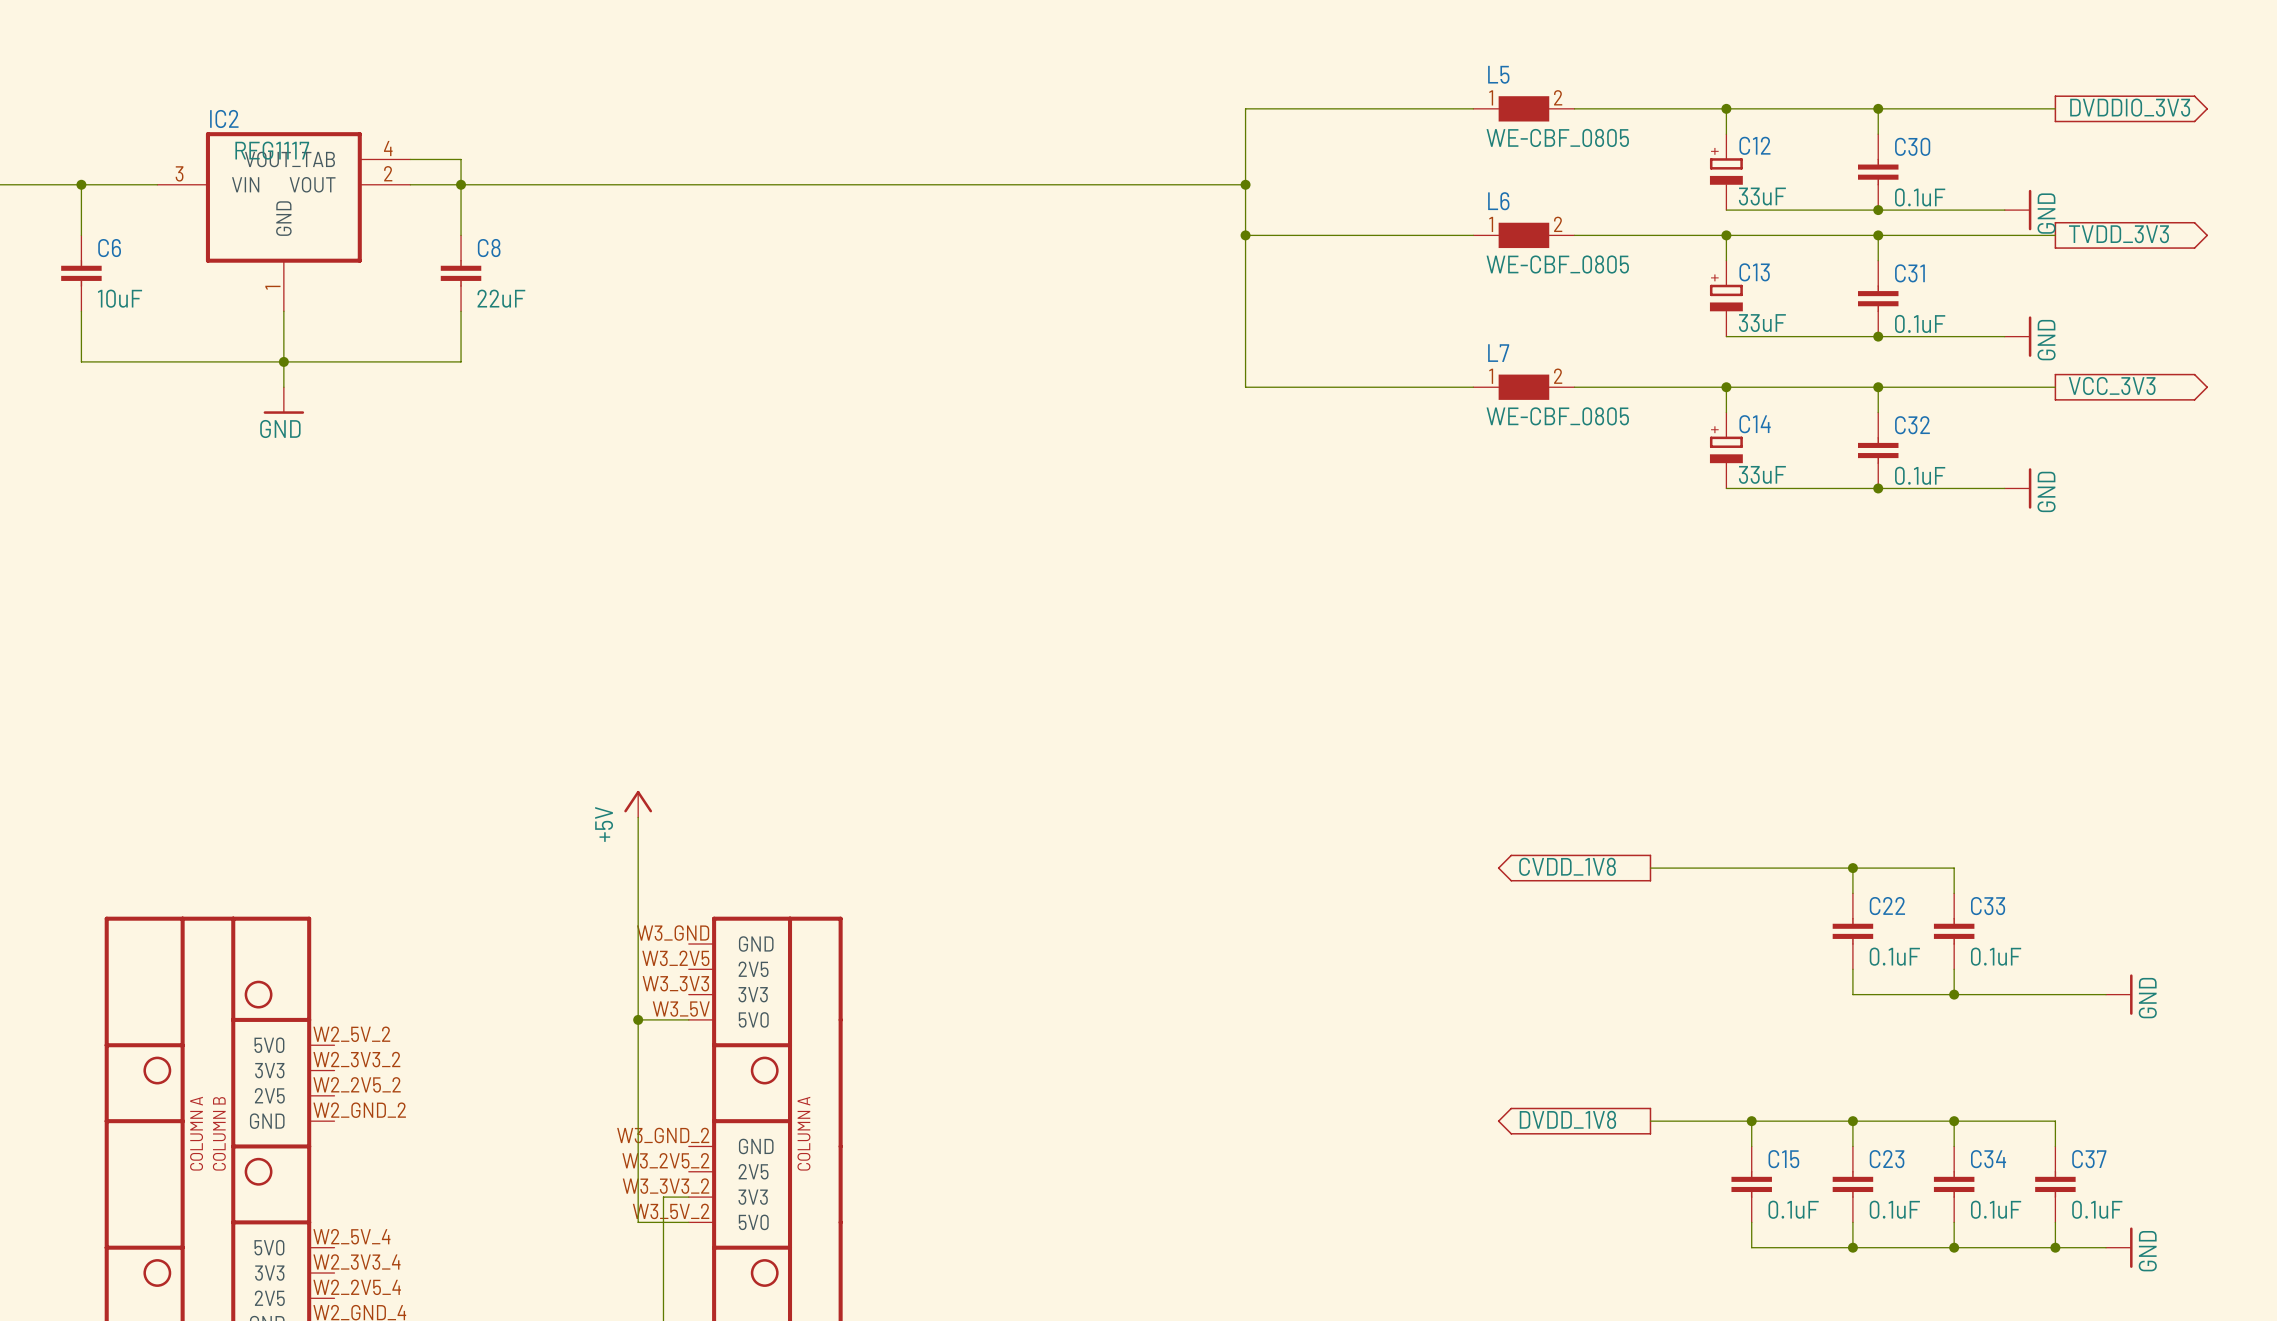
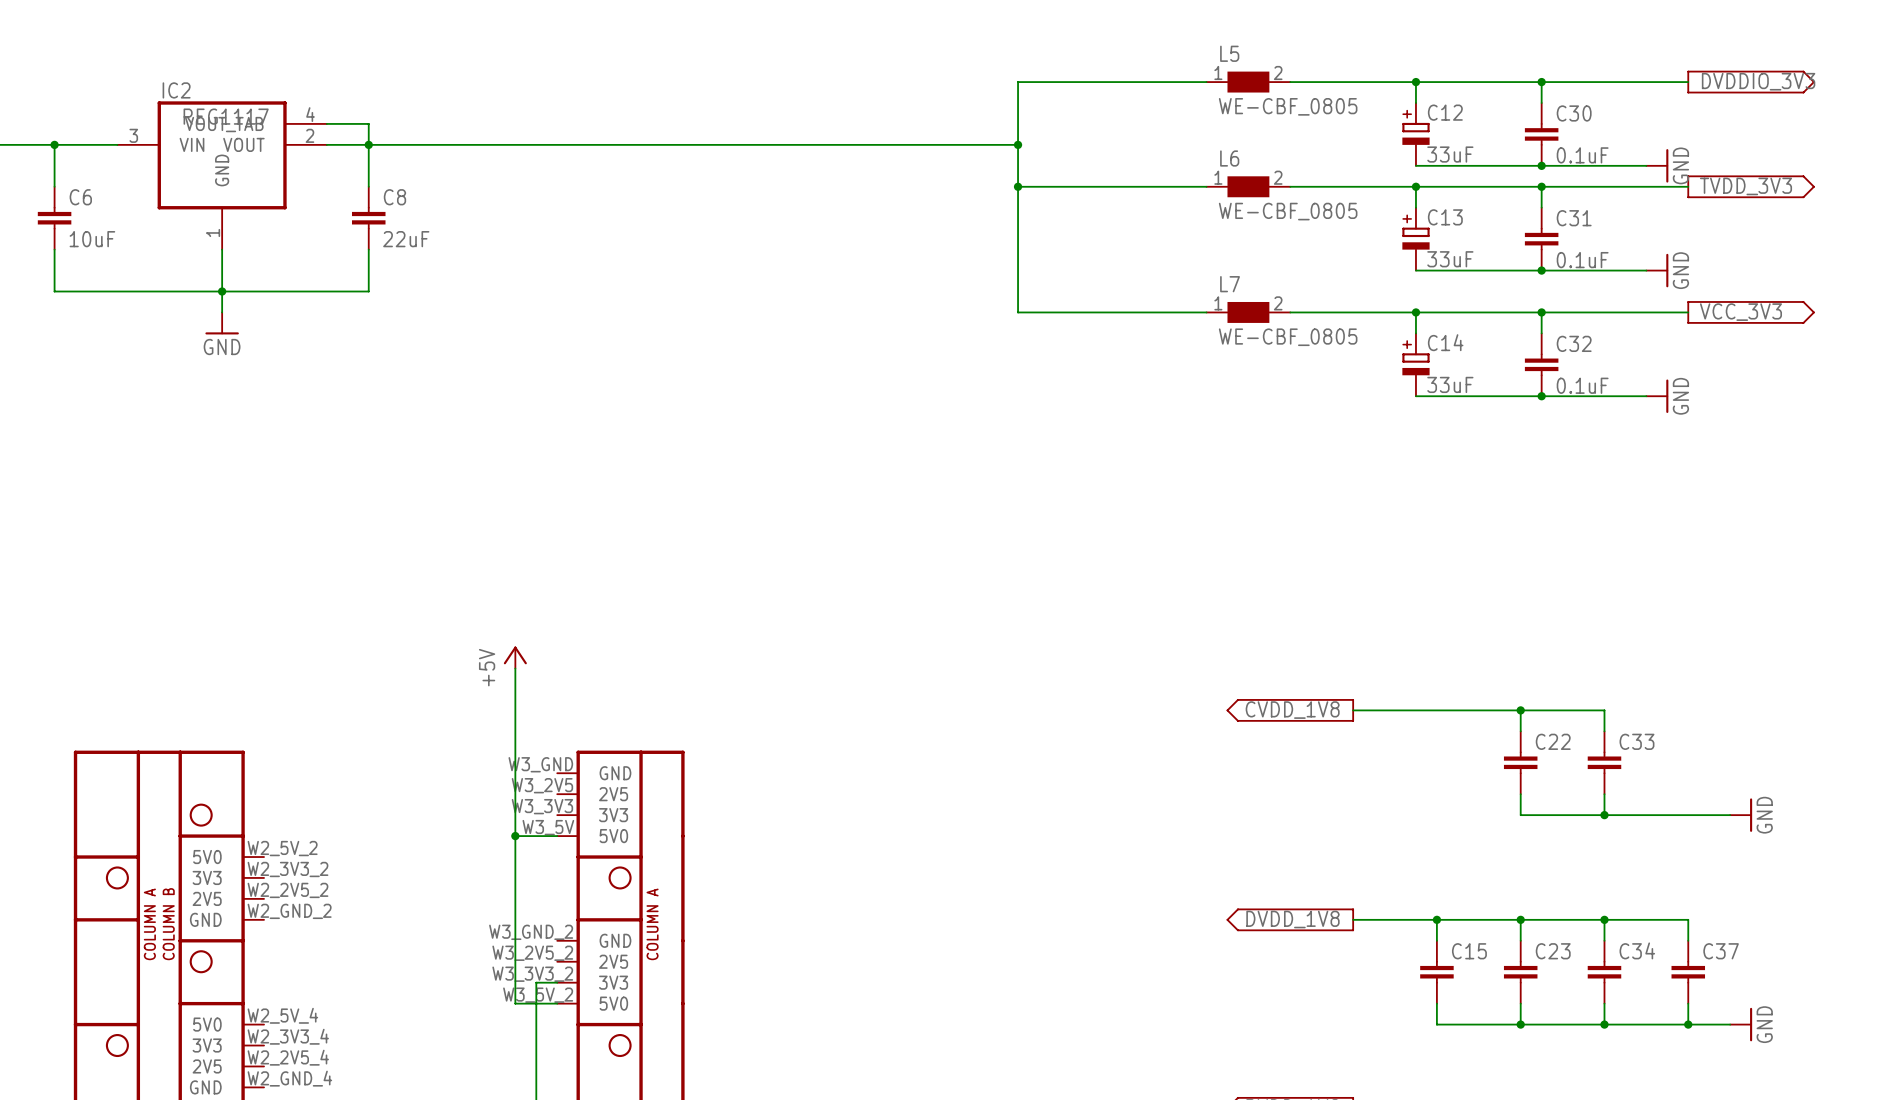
C22 value: 0.1uF (1894, 956) -> none
C33 value: 0.1uF (1996, 956) -> none
C15 value: 0.1uF (1793, 1209) -> none
C23 value: 0.1uF (1894, 1209) -> none
C34 value: 0.1uF (1996, 1209) -> none
C37 value: 0.1uF (2097, 1209) -> none

